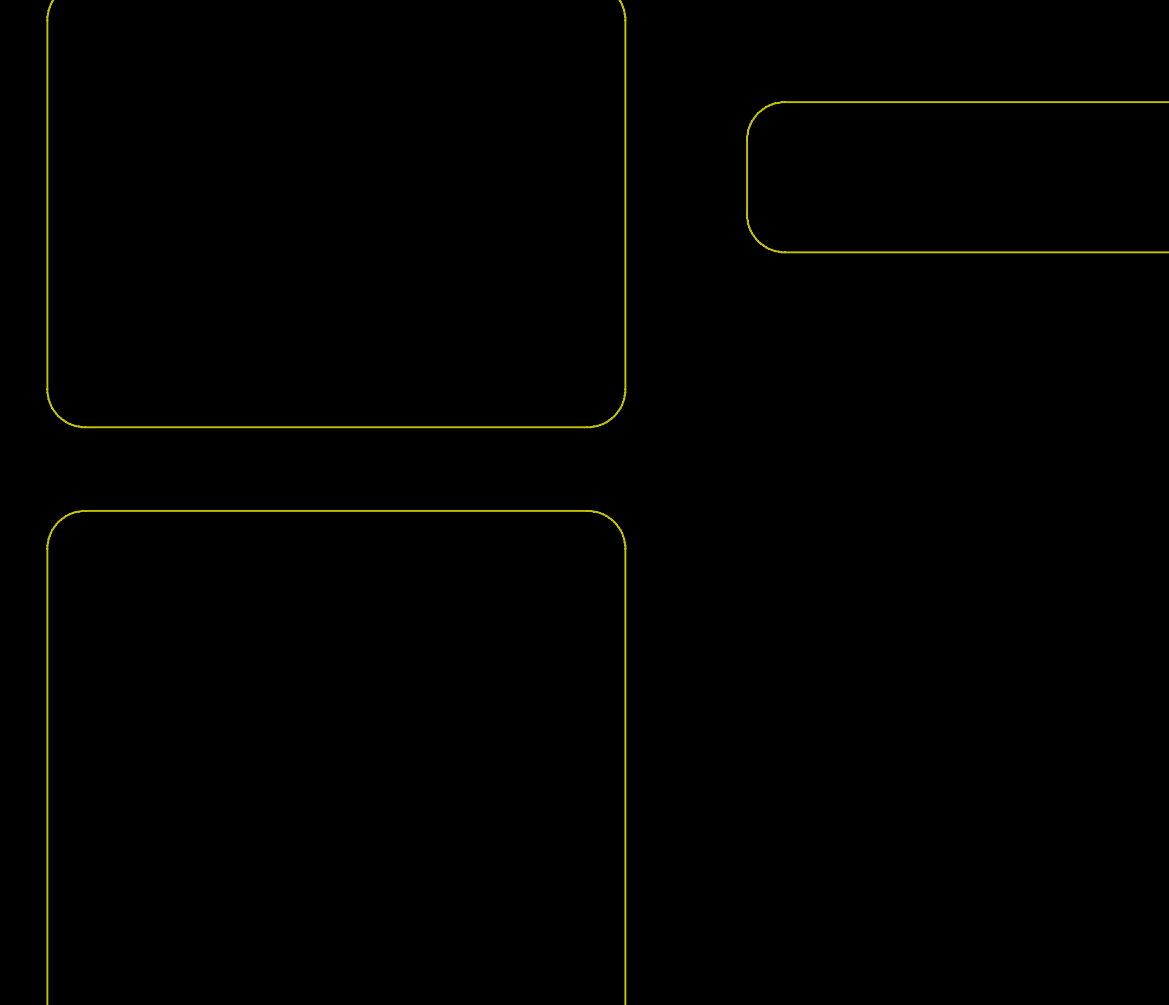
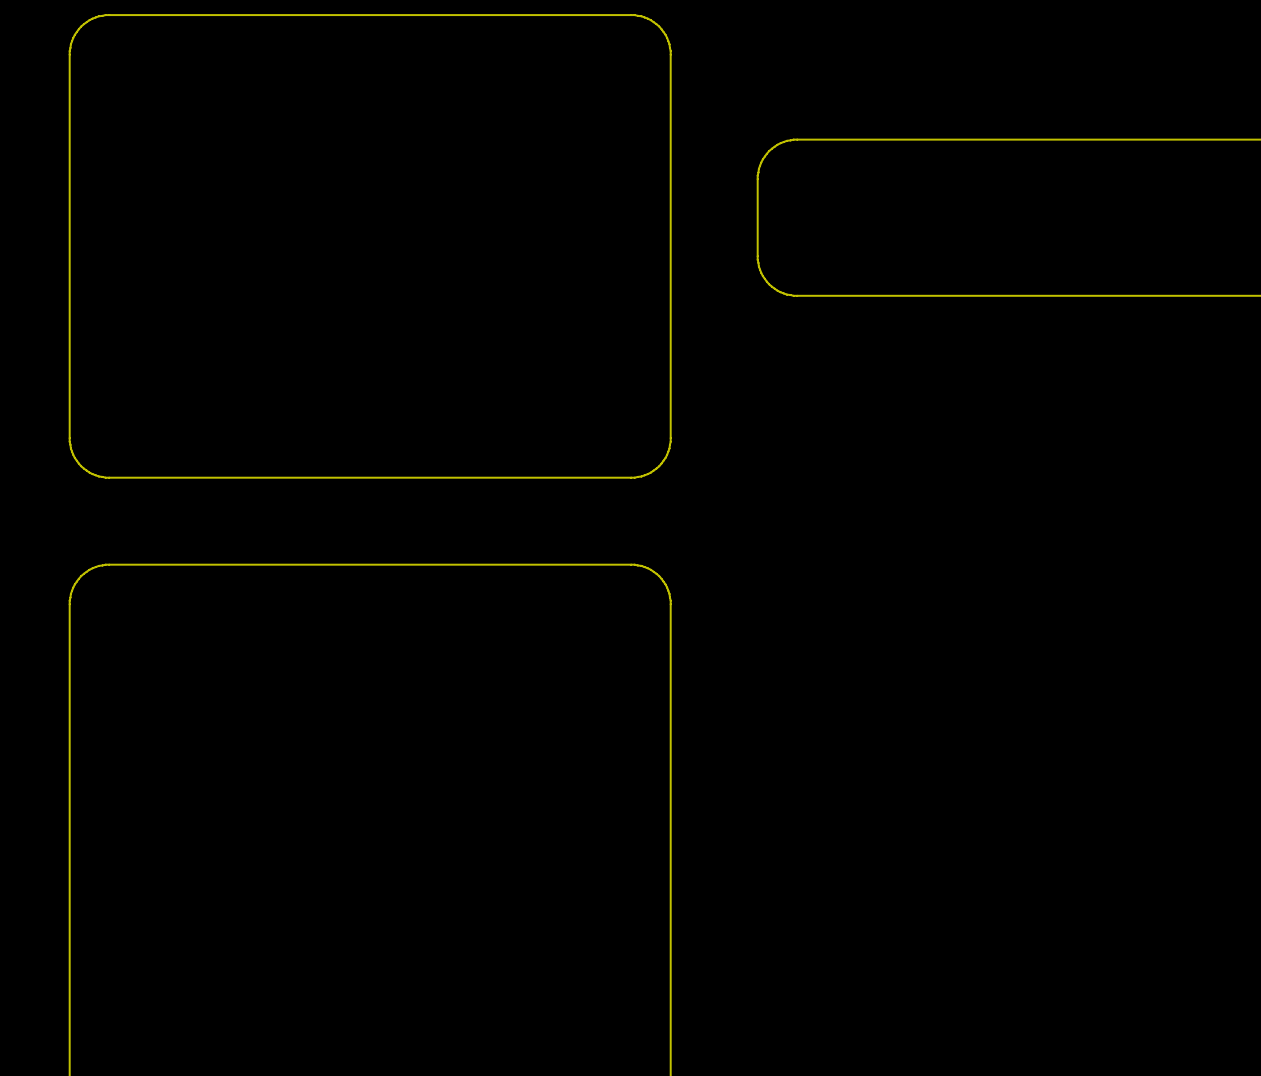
board edge: (781, 102) (769, 105) (758, 113) (750, 124) (747, 136) (748, 224) (752, 233) (760, 243) (769, 248) (781, 252) -> (833, 139) (793, 139) (780, 143) (769, 151) (762, 159) (757, 175) (757, 259) (762, 276) (771, 286) (786, 294) (833, 295)

